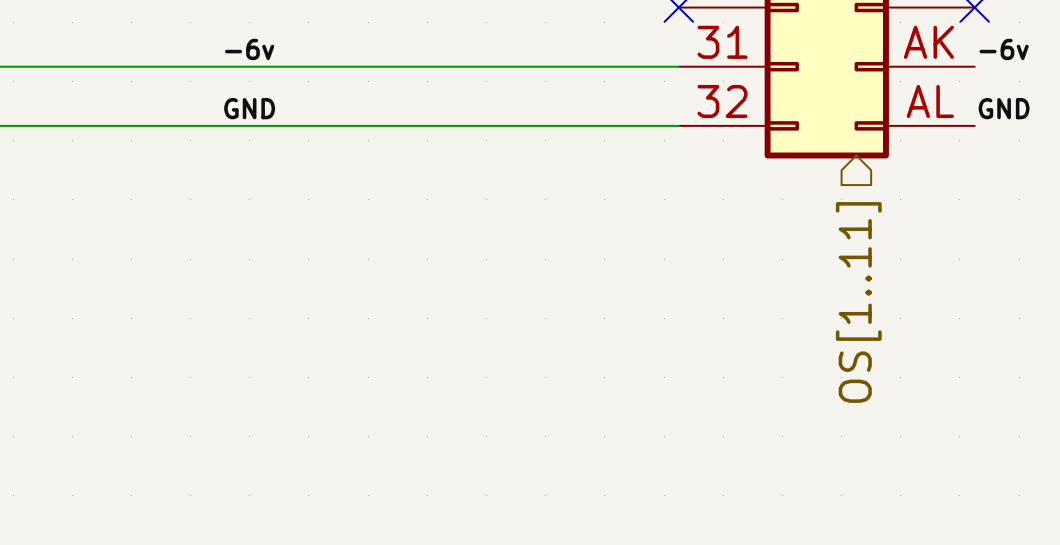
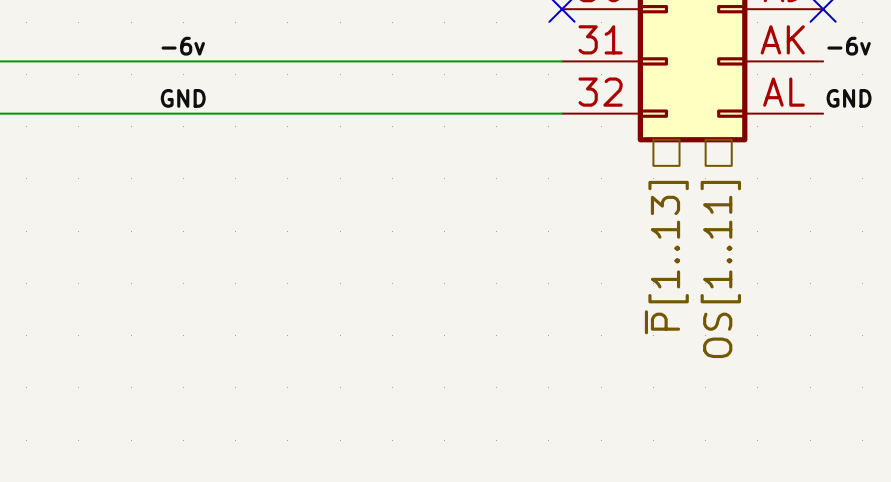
hierarchical label: none -> ~{P}[1..13] (666, 257)
hierarchical label shape: input (858, 302) -> passive (720, 269)

